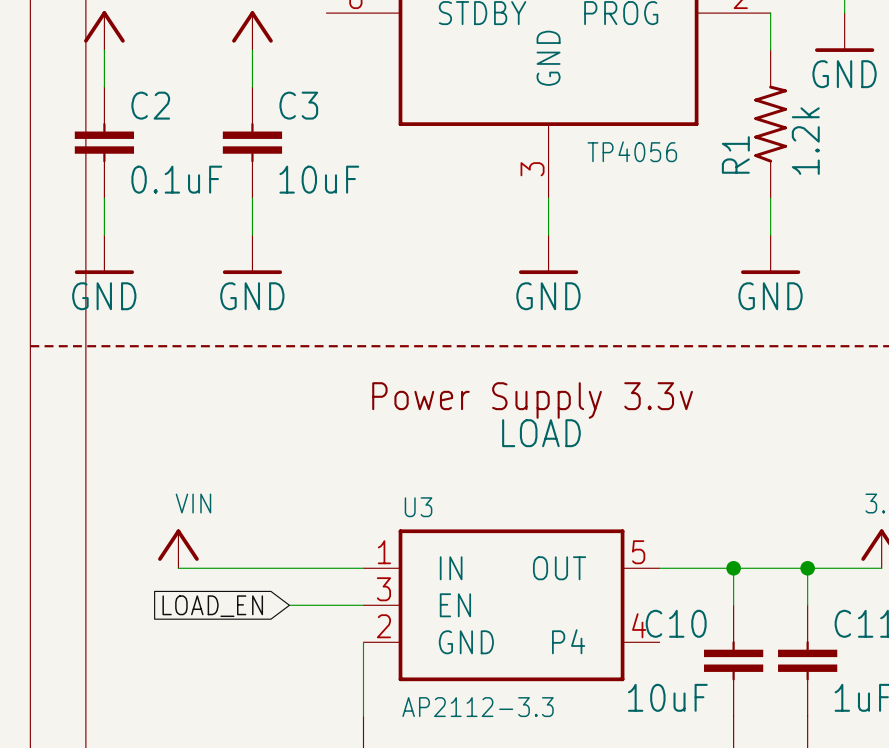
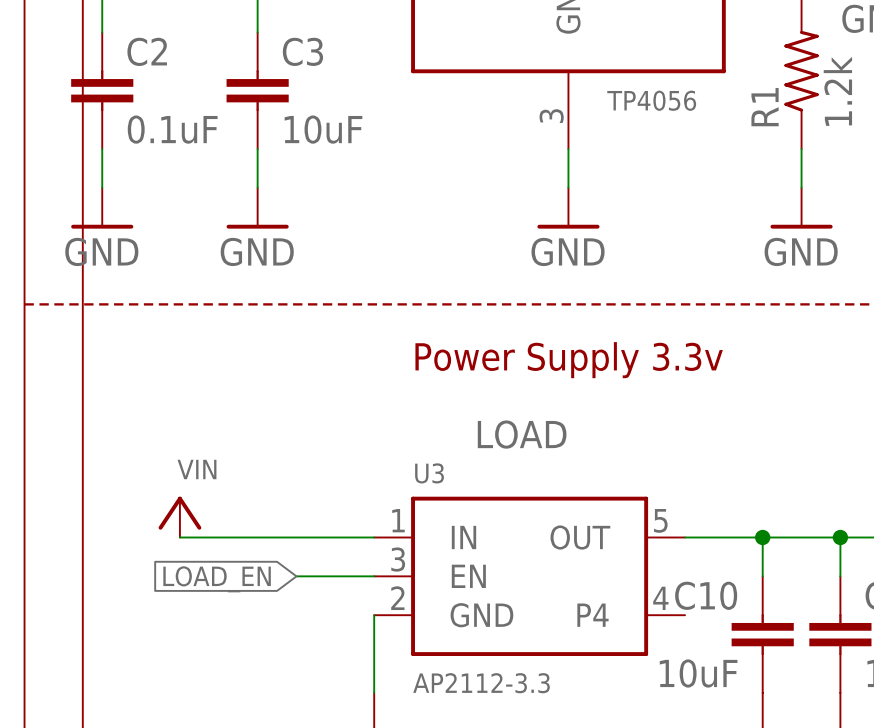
text position: LOAD (541, 433) -> LOAD (522, 434)

